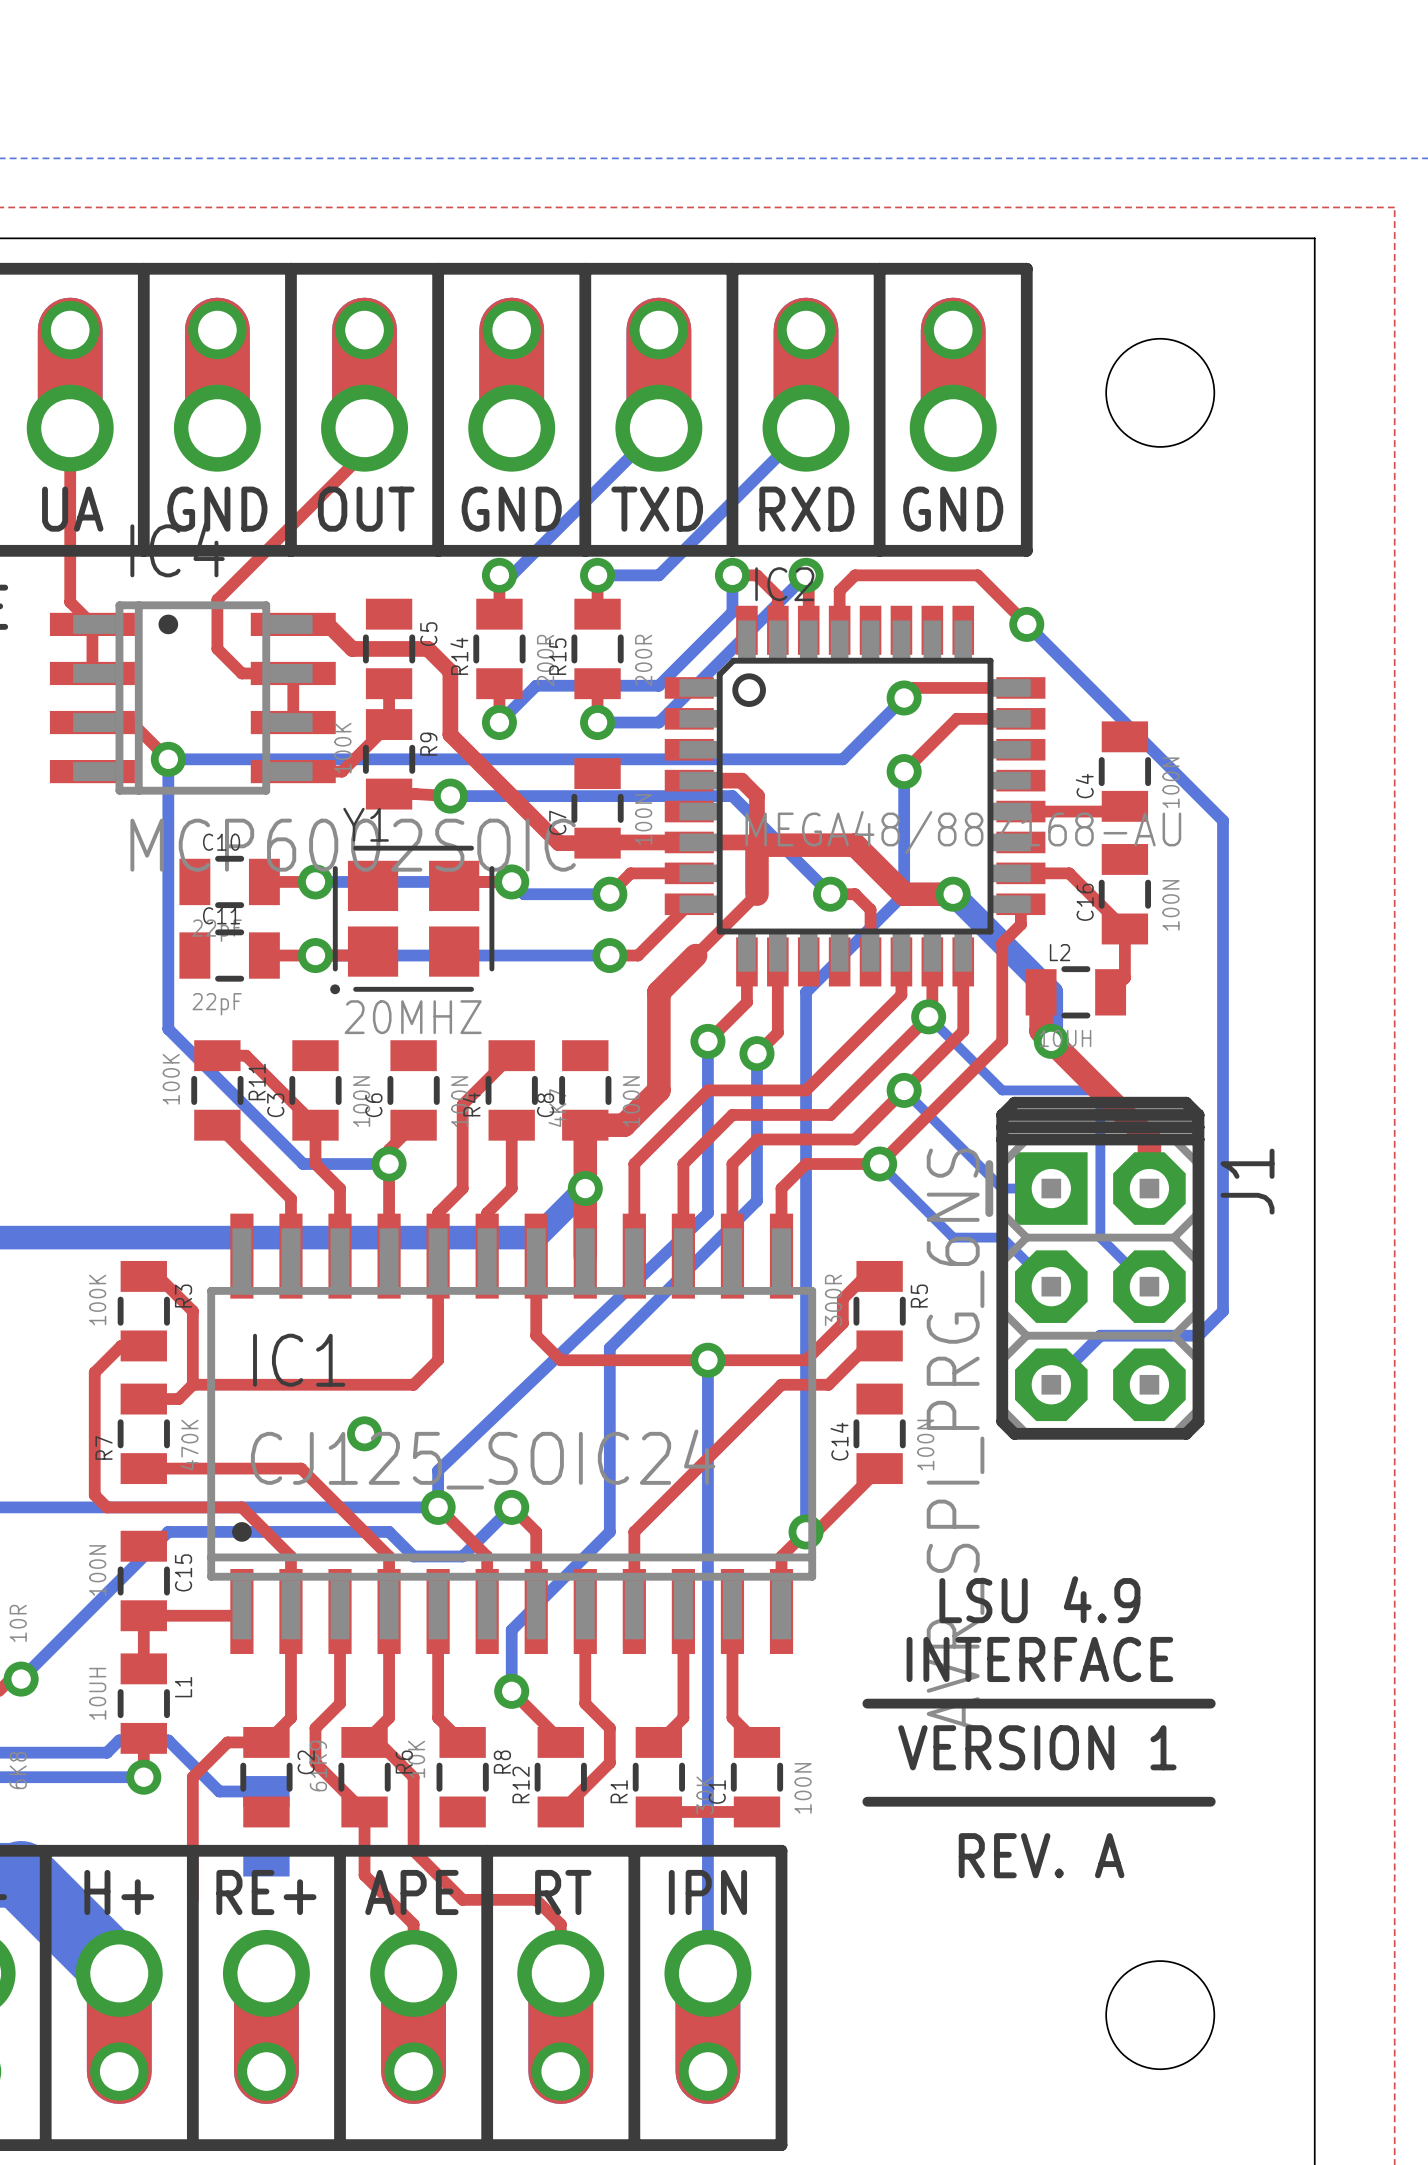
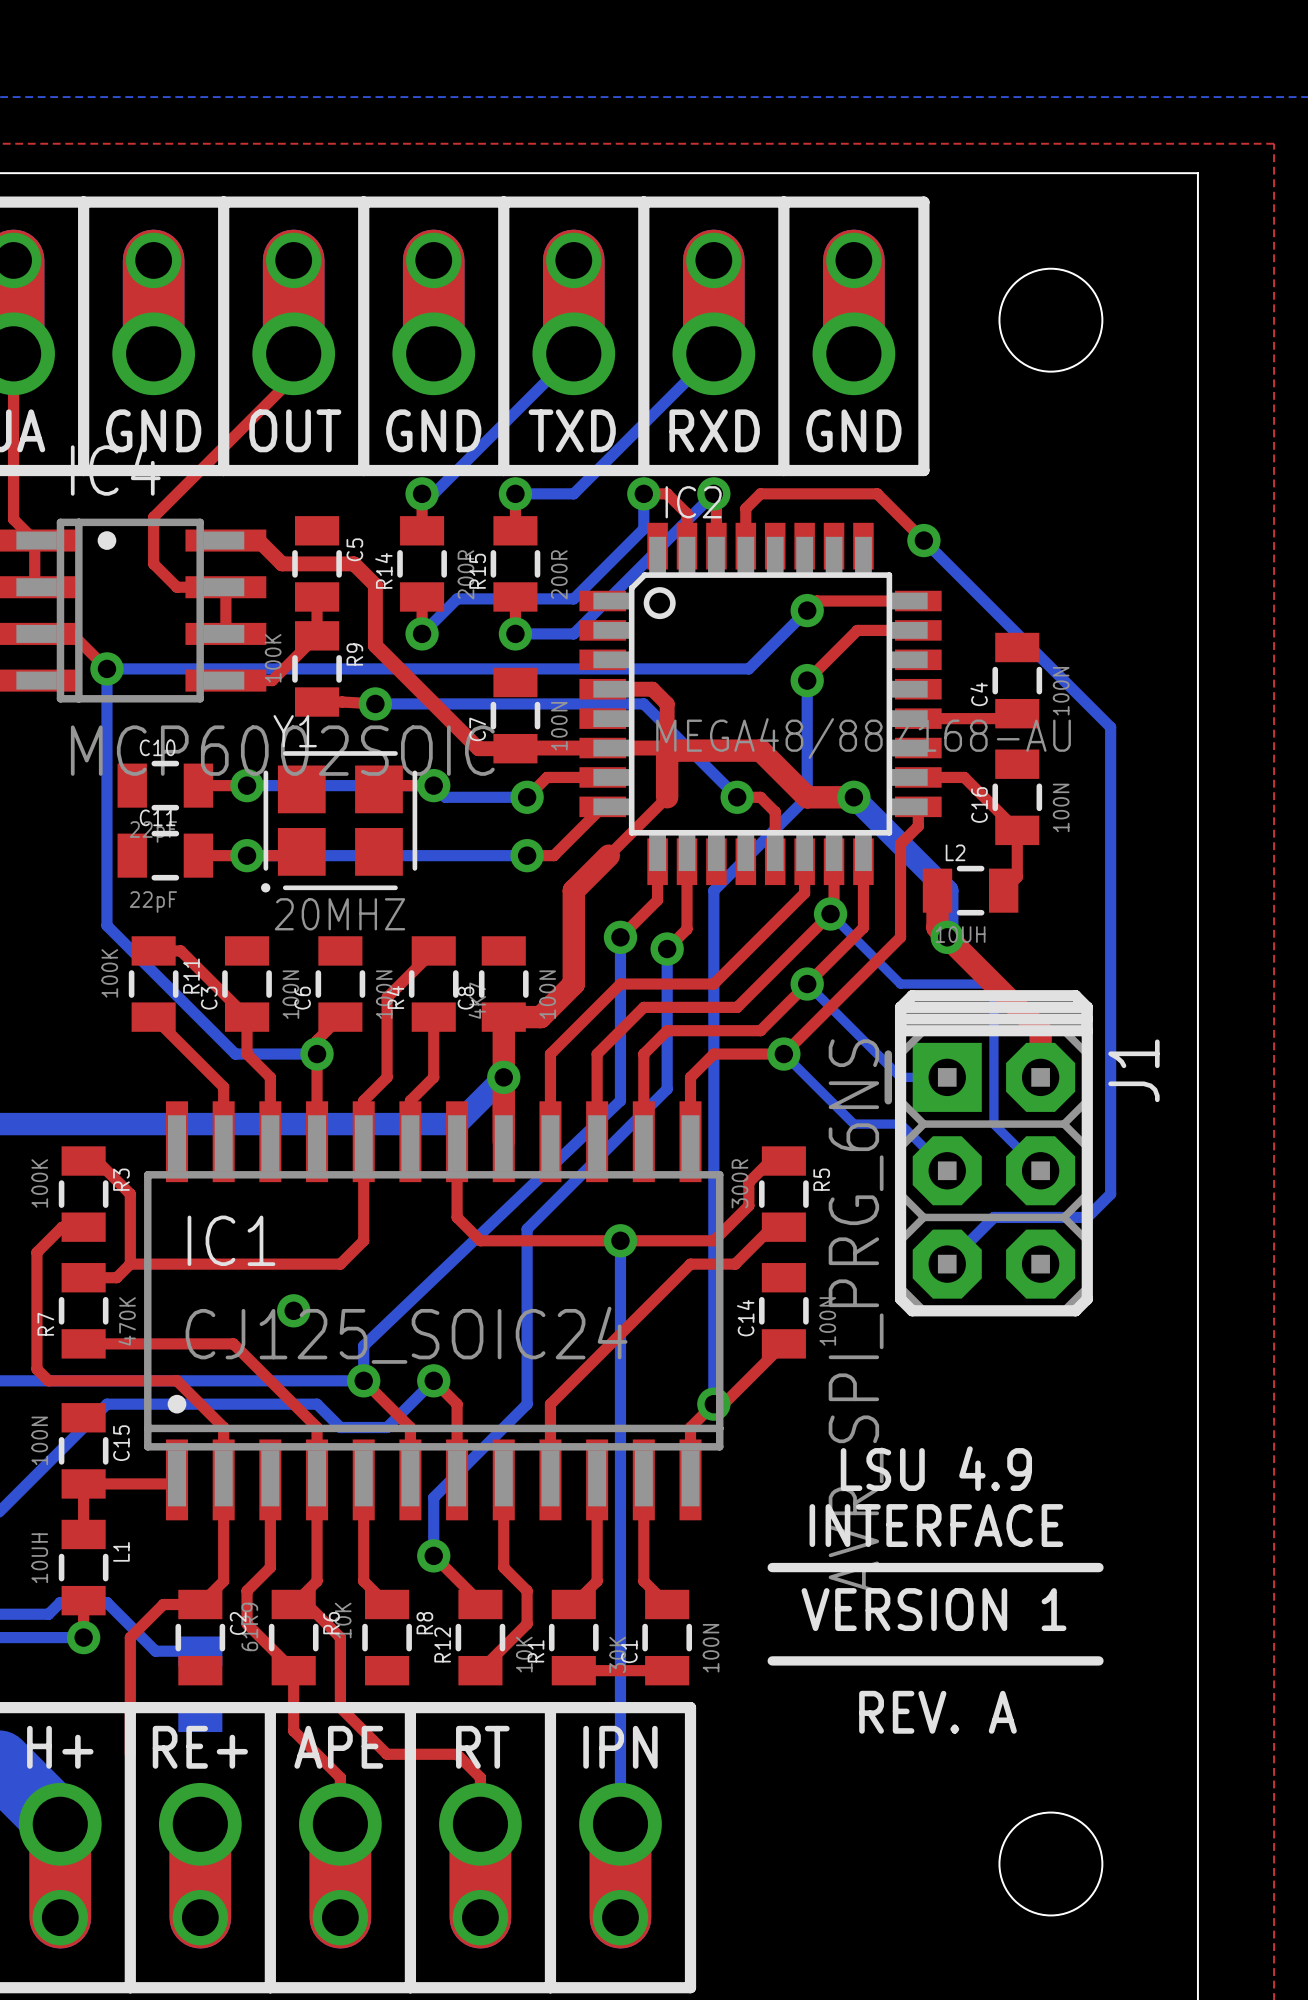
R12 value: none -> 10K (524, 1654)

